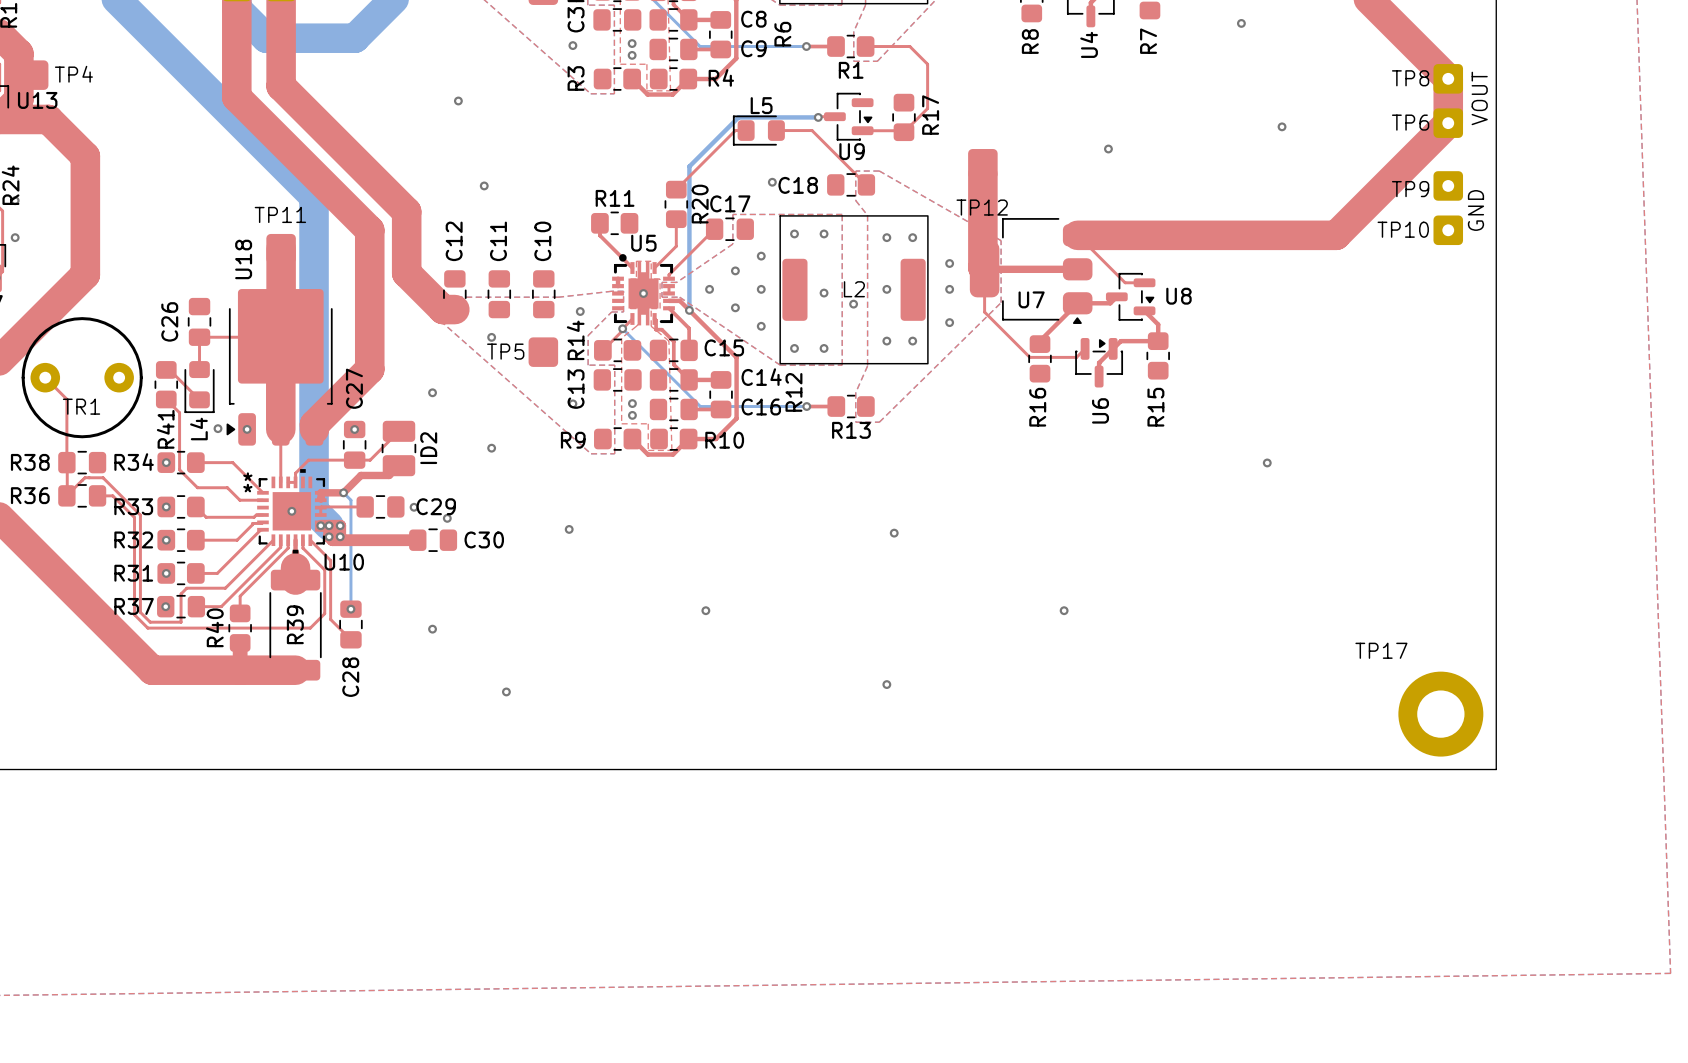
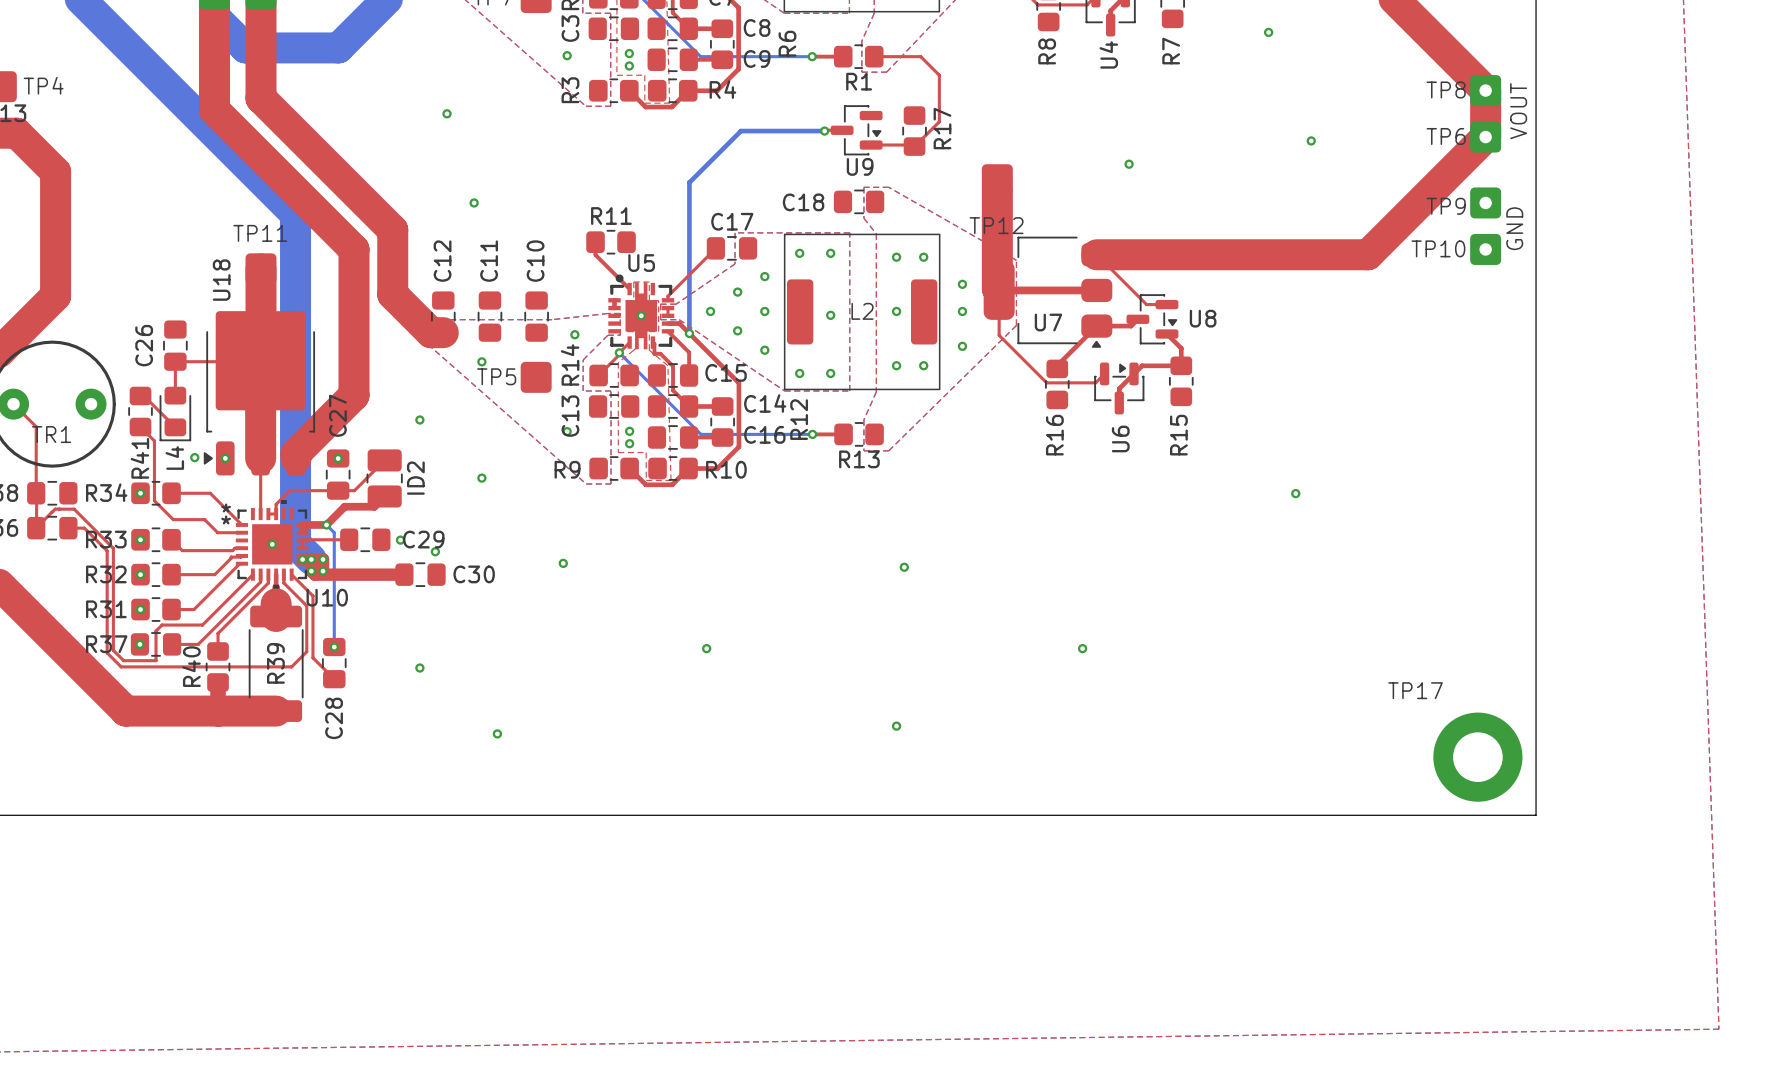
top track: (746, 130) (735, 130) (676, 189) -> none
L5: (758, 130) -> none
top track: (776, 130) (812, 130) (866, 184) -> none
via: (772, 182) -> none
R20: (676, 204) -> none
top track: (676, 219) (676, 246) (654, 268) -> none
via: (853, 304) -> none

